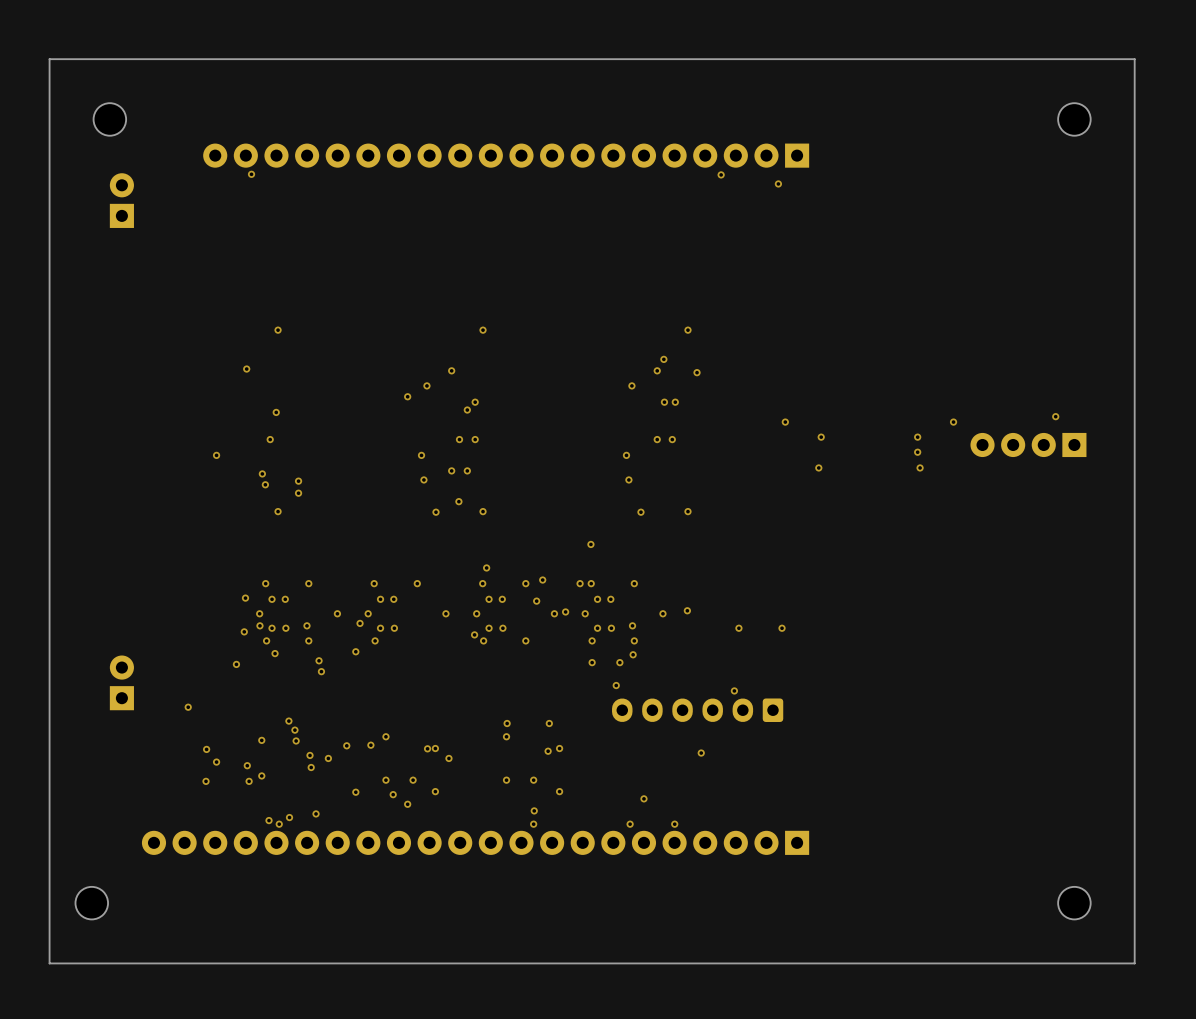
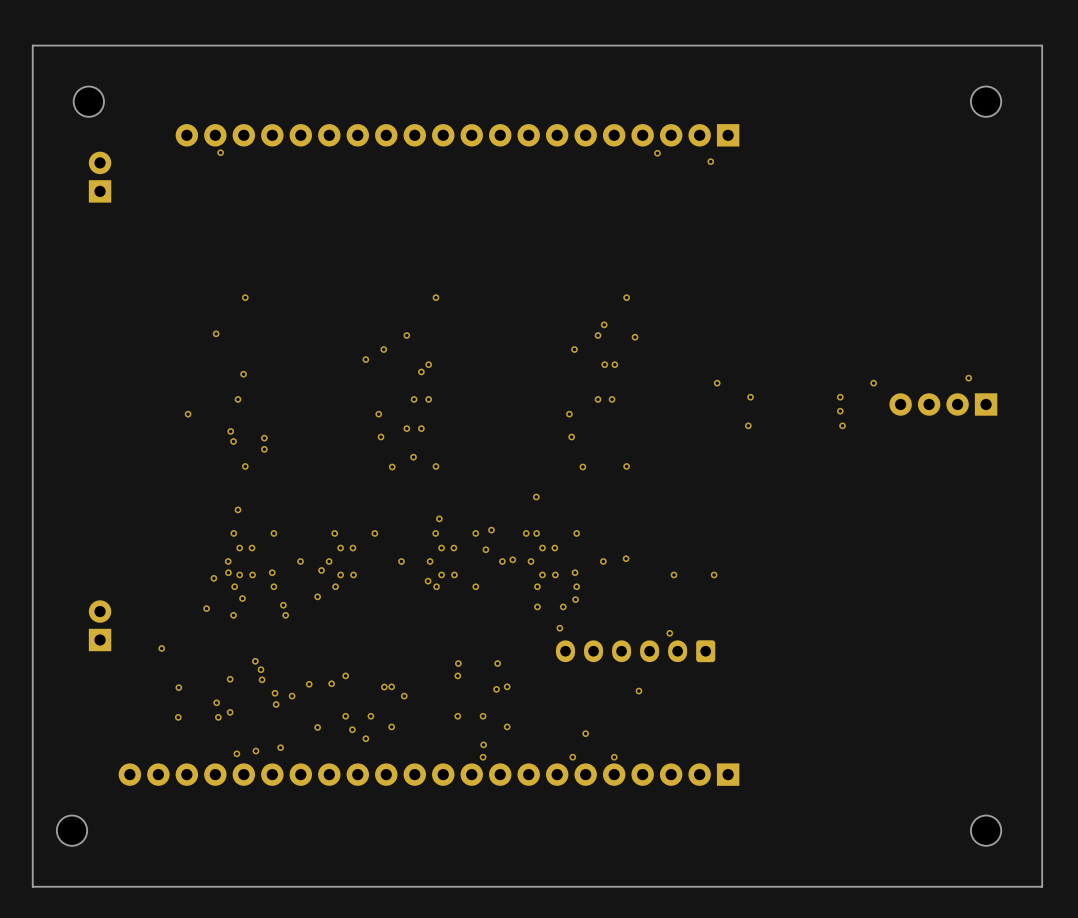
via: none -> (238, 509)
via: (245, 598) -> none
via: none -> (233, 615)
via: (216, 762) -> none
via: (279, 824) -> none

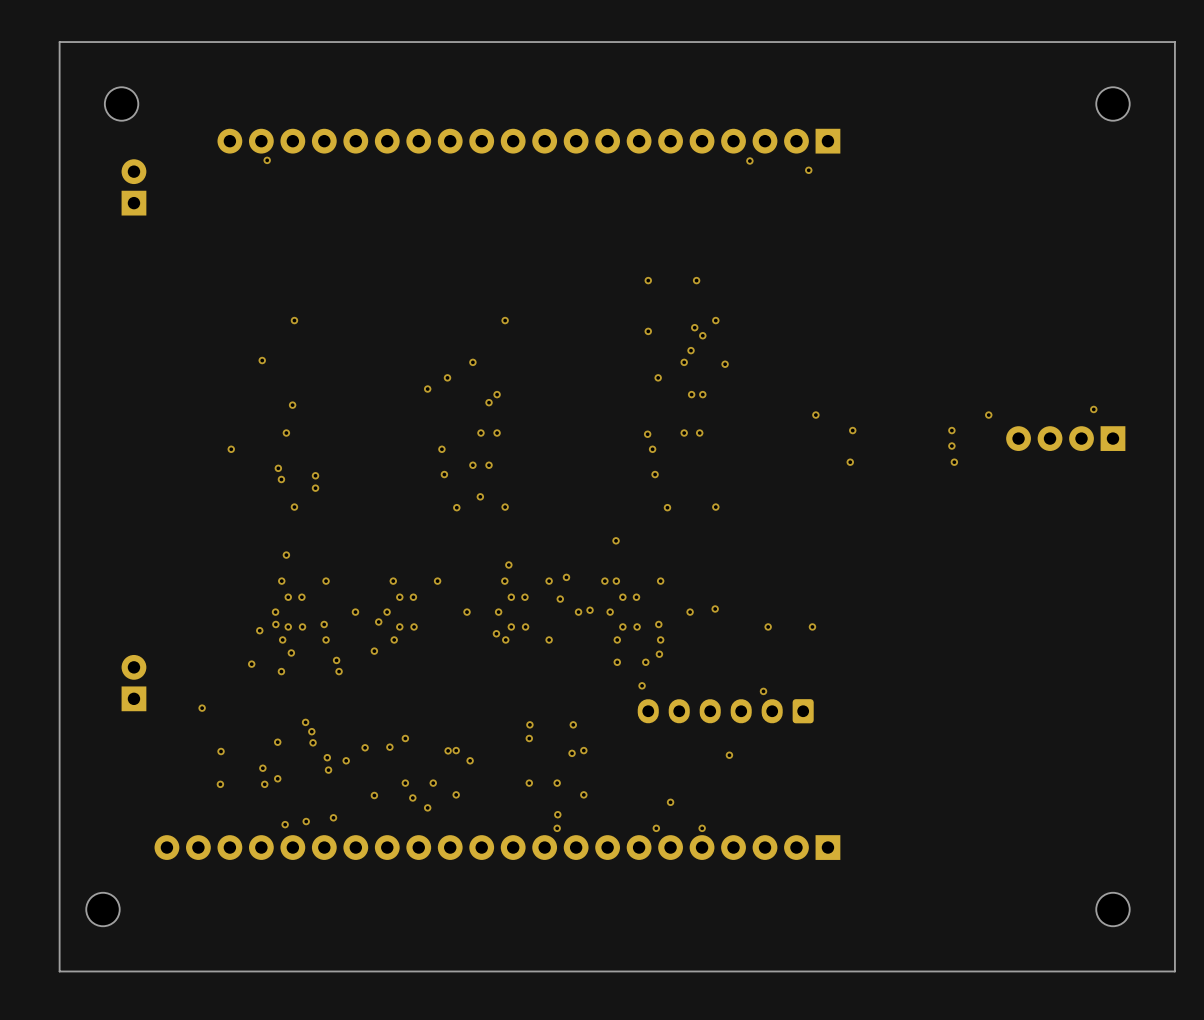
via: none -> (648, 280)
via: none -> (696, 280)
via: none -> (694, 327)
via: none -> (648, 331)
via: none -> (702, 335)
via: none -> (647, 434)

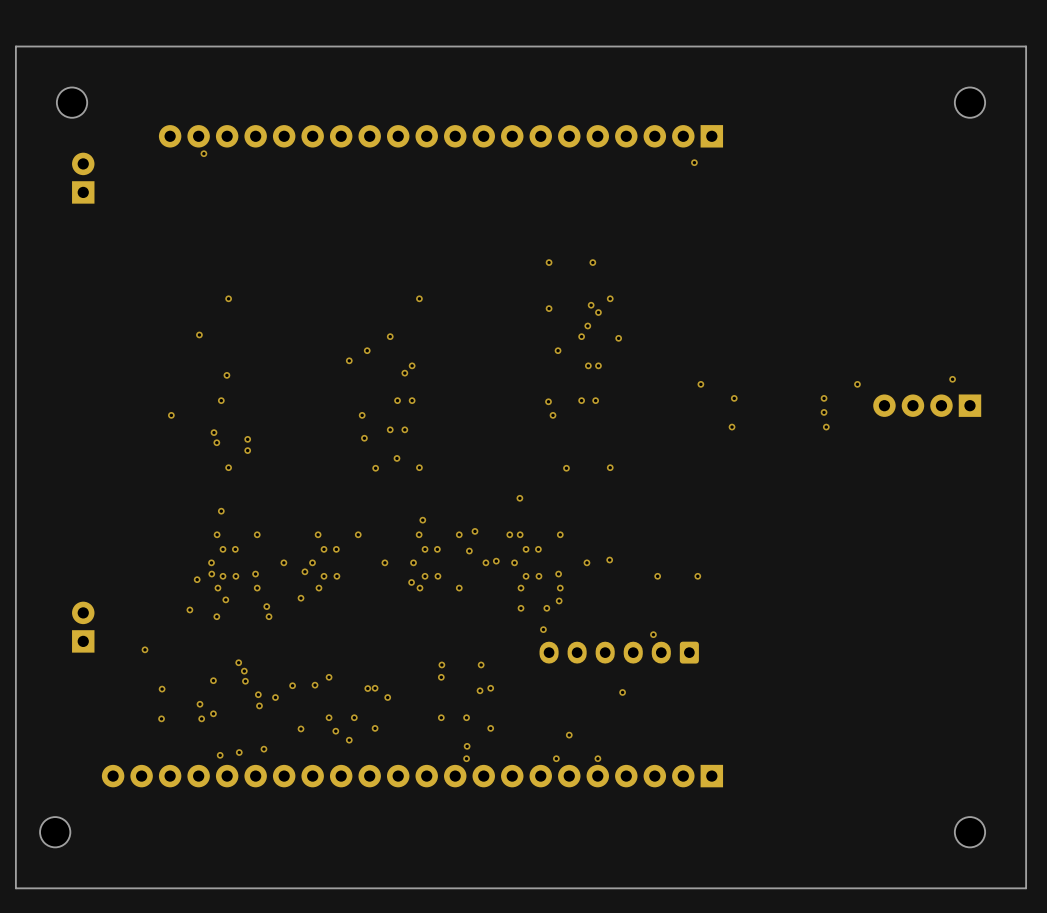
via: (749, 161) -> none
via: (655, 474) -> none

